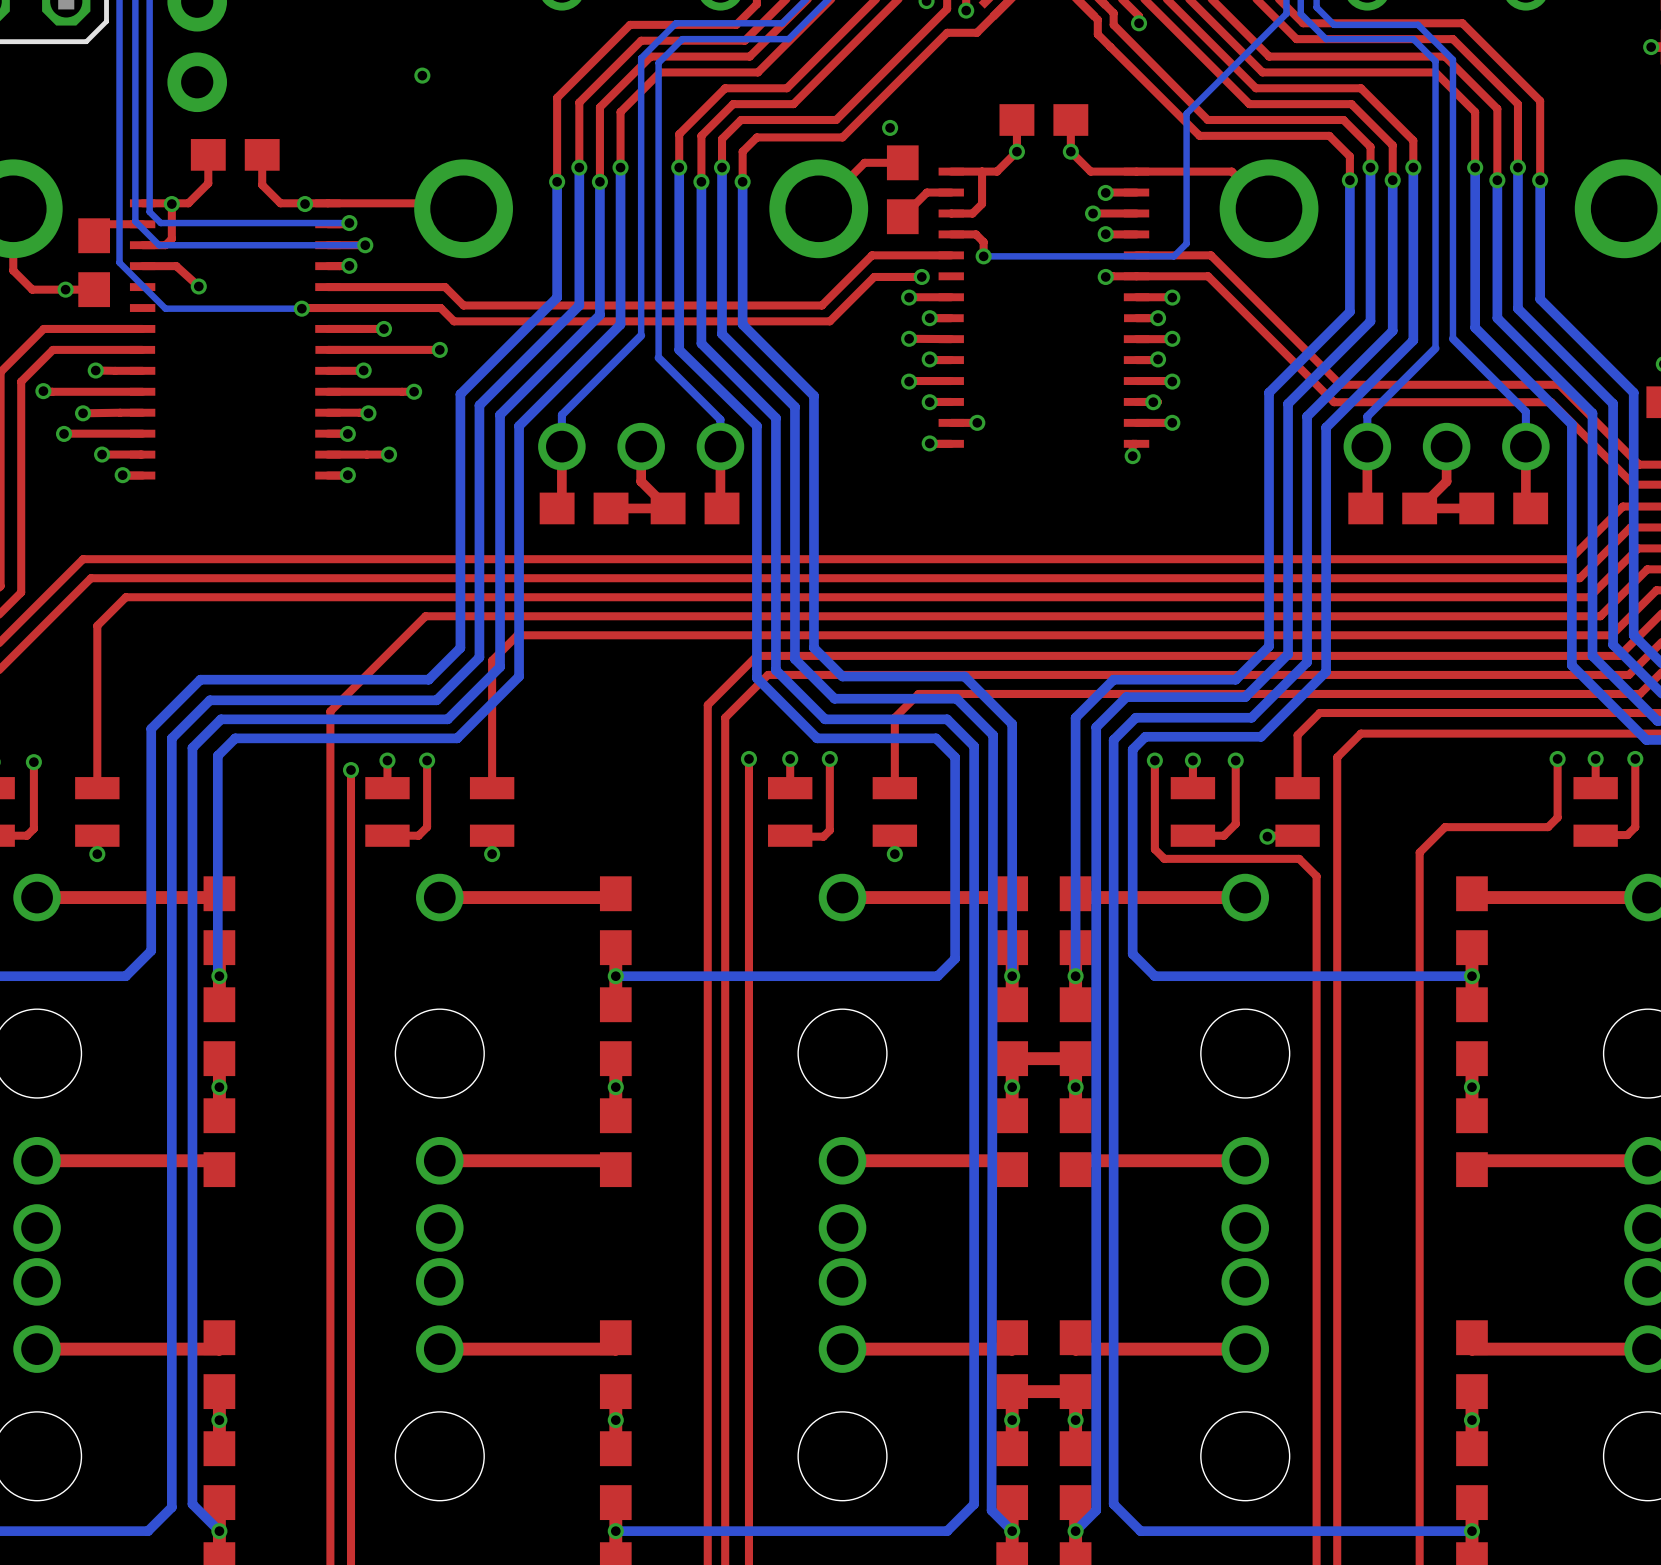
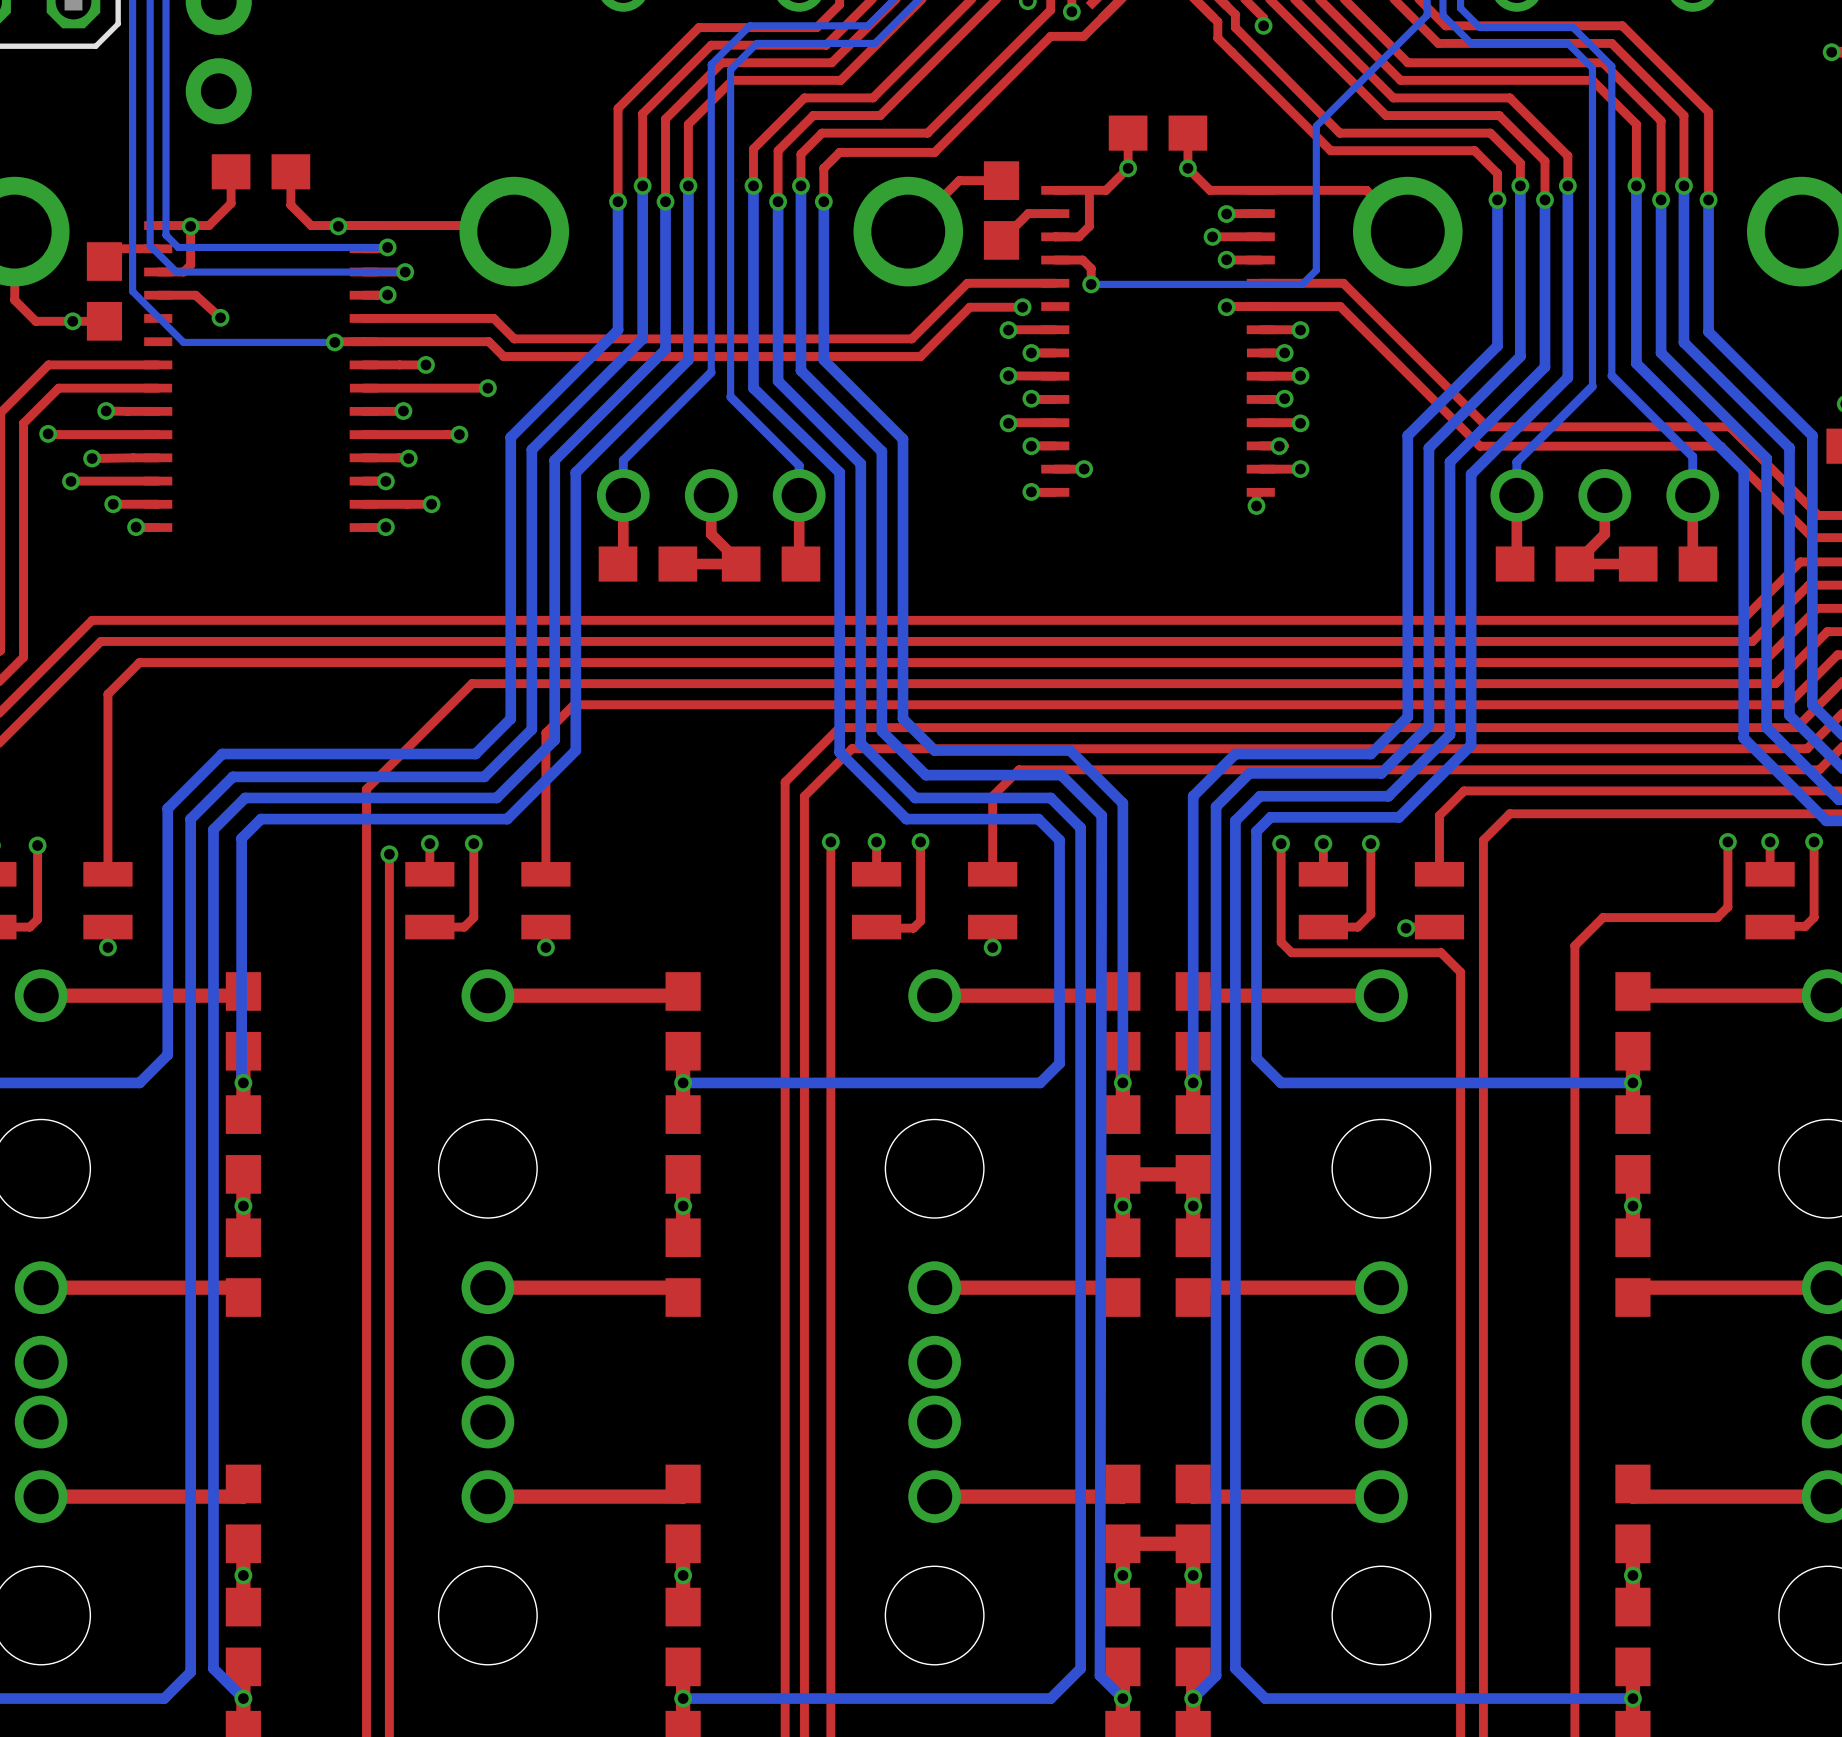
via: (422, 75) -> none
via: (890, 127) -> none

